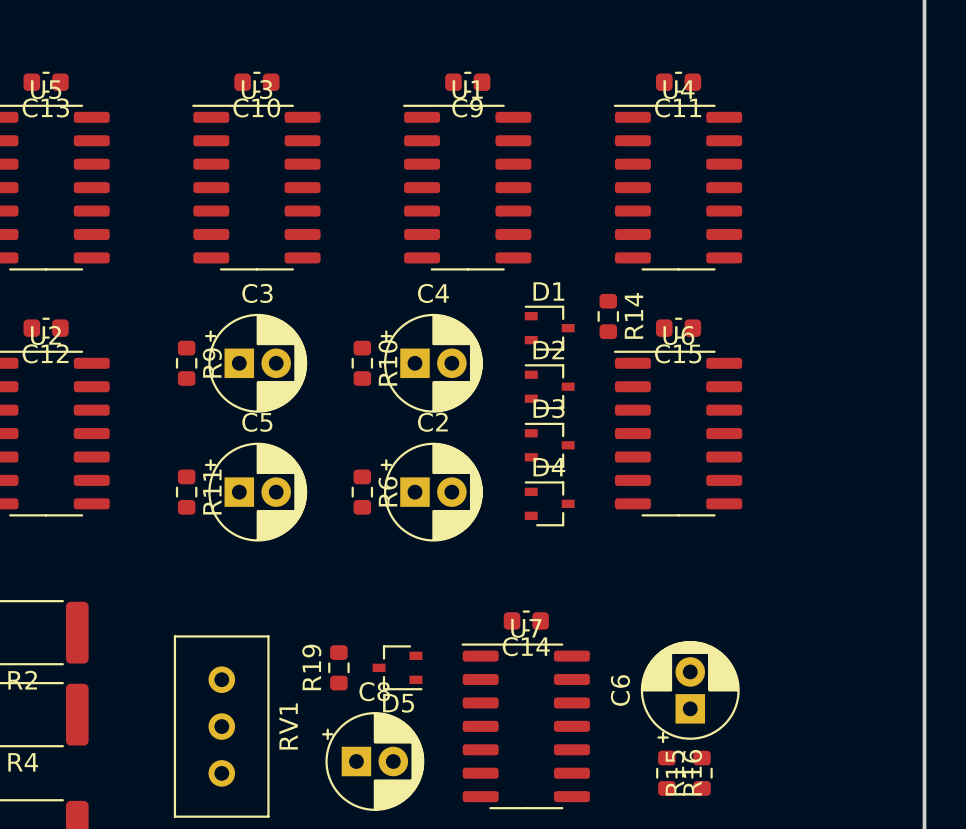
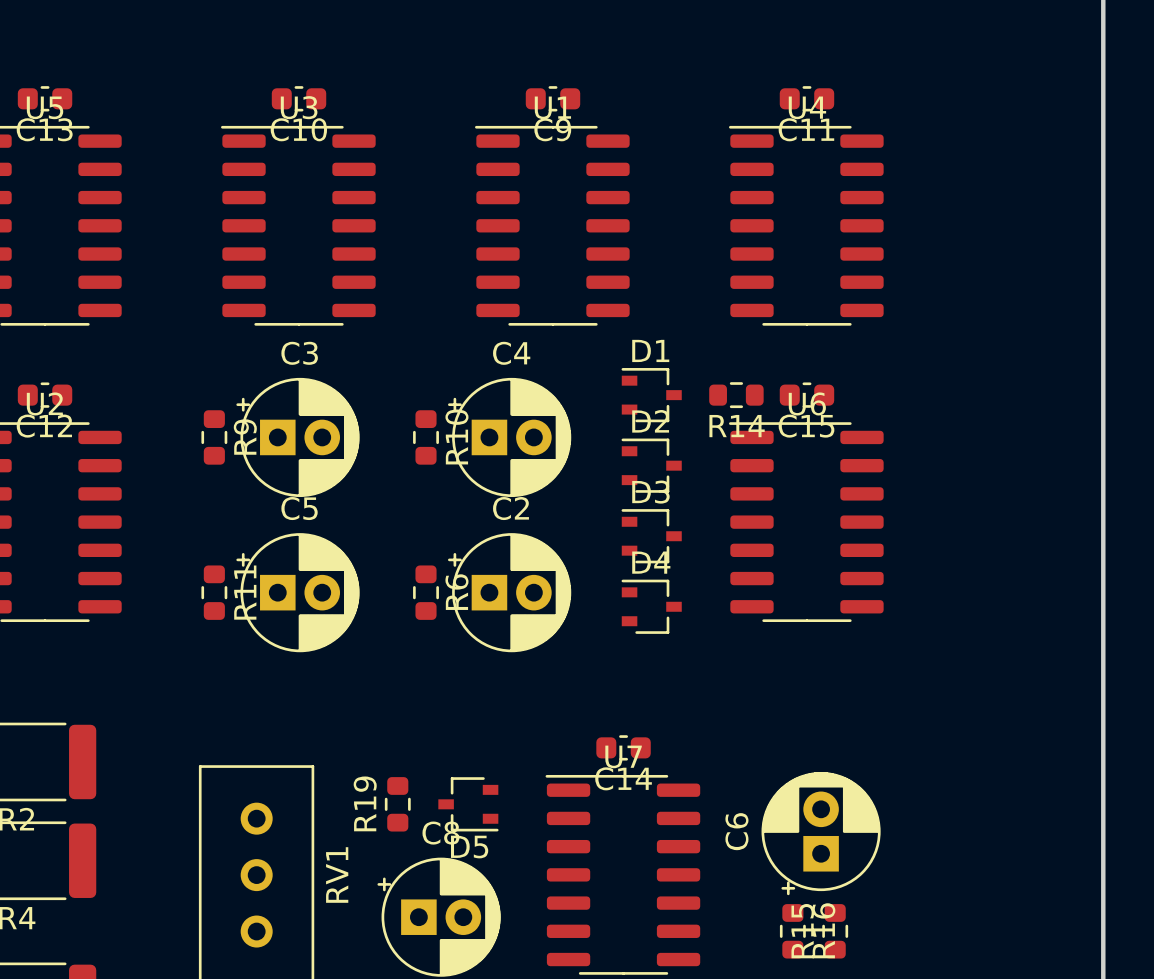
R14 rotation: 0° (608, 316) -> 90° clockwise (736, 395)

